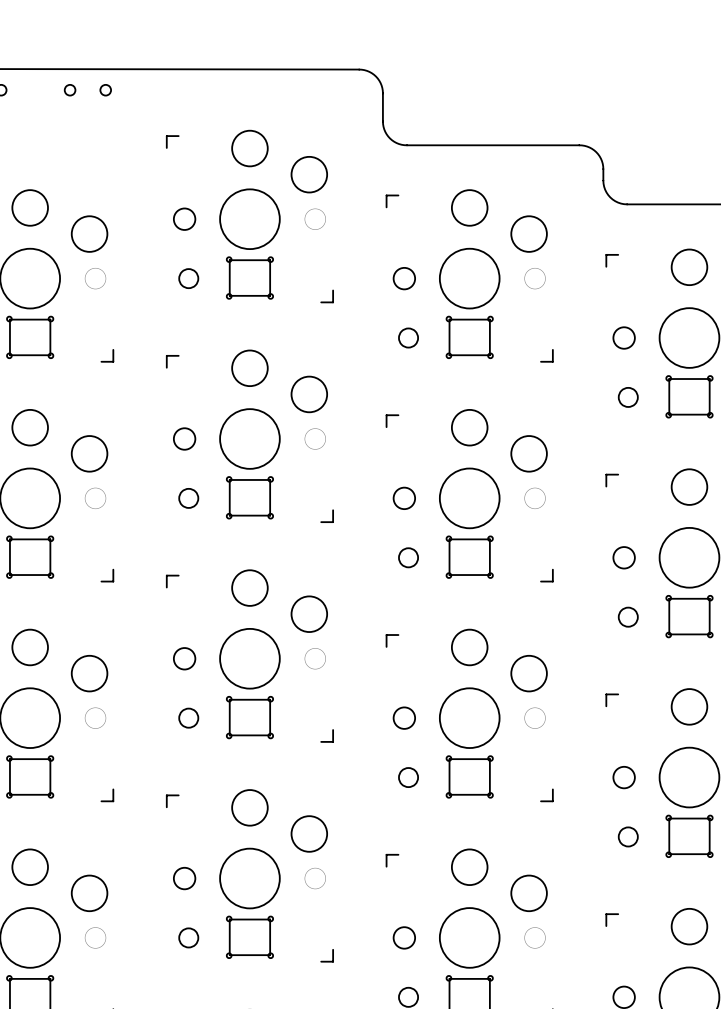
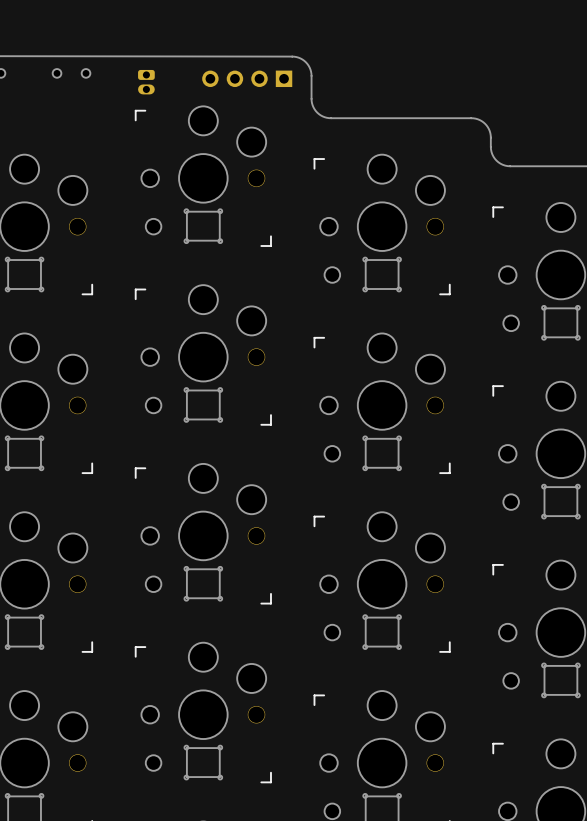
part: none -> (247, 78)
part: none -> (146, 82)

